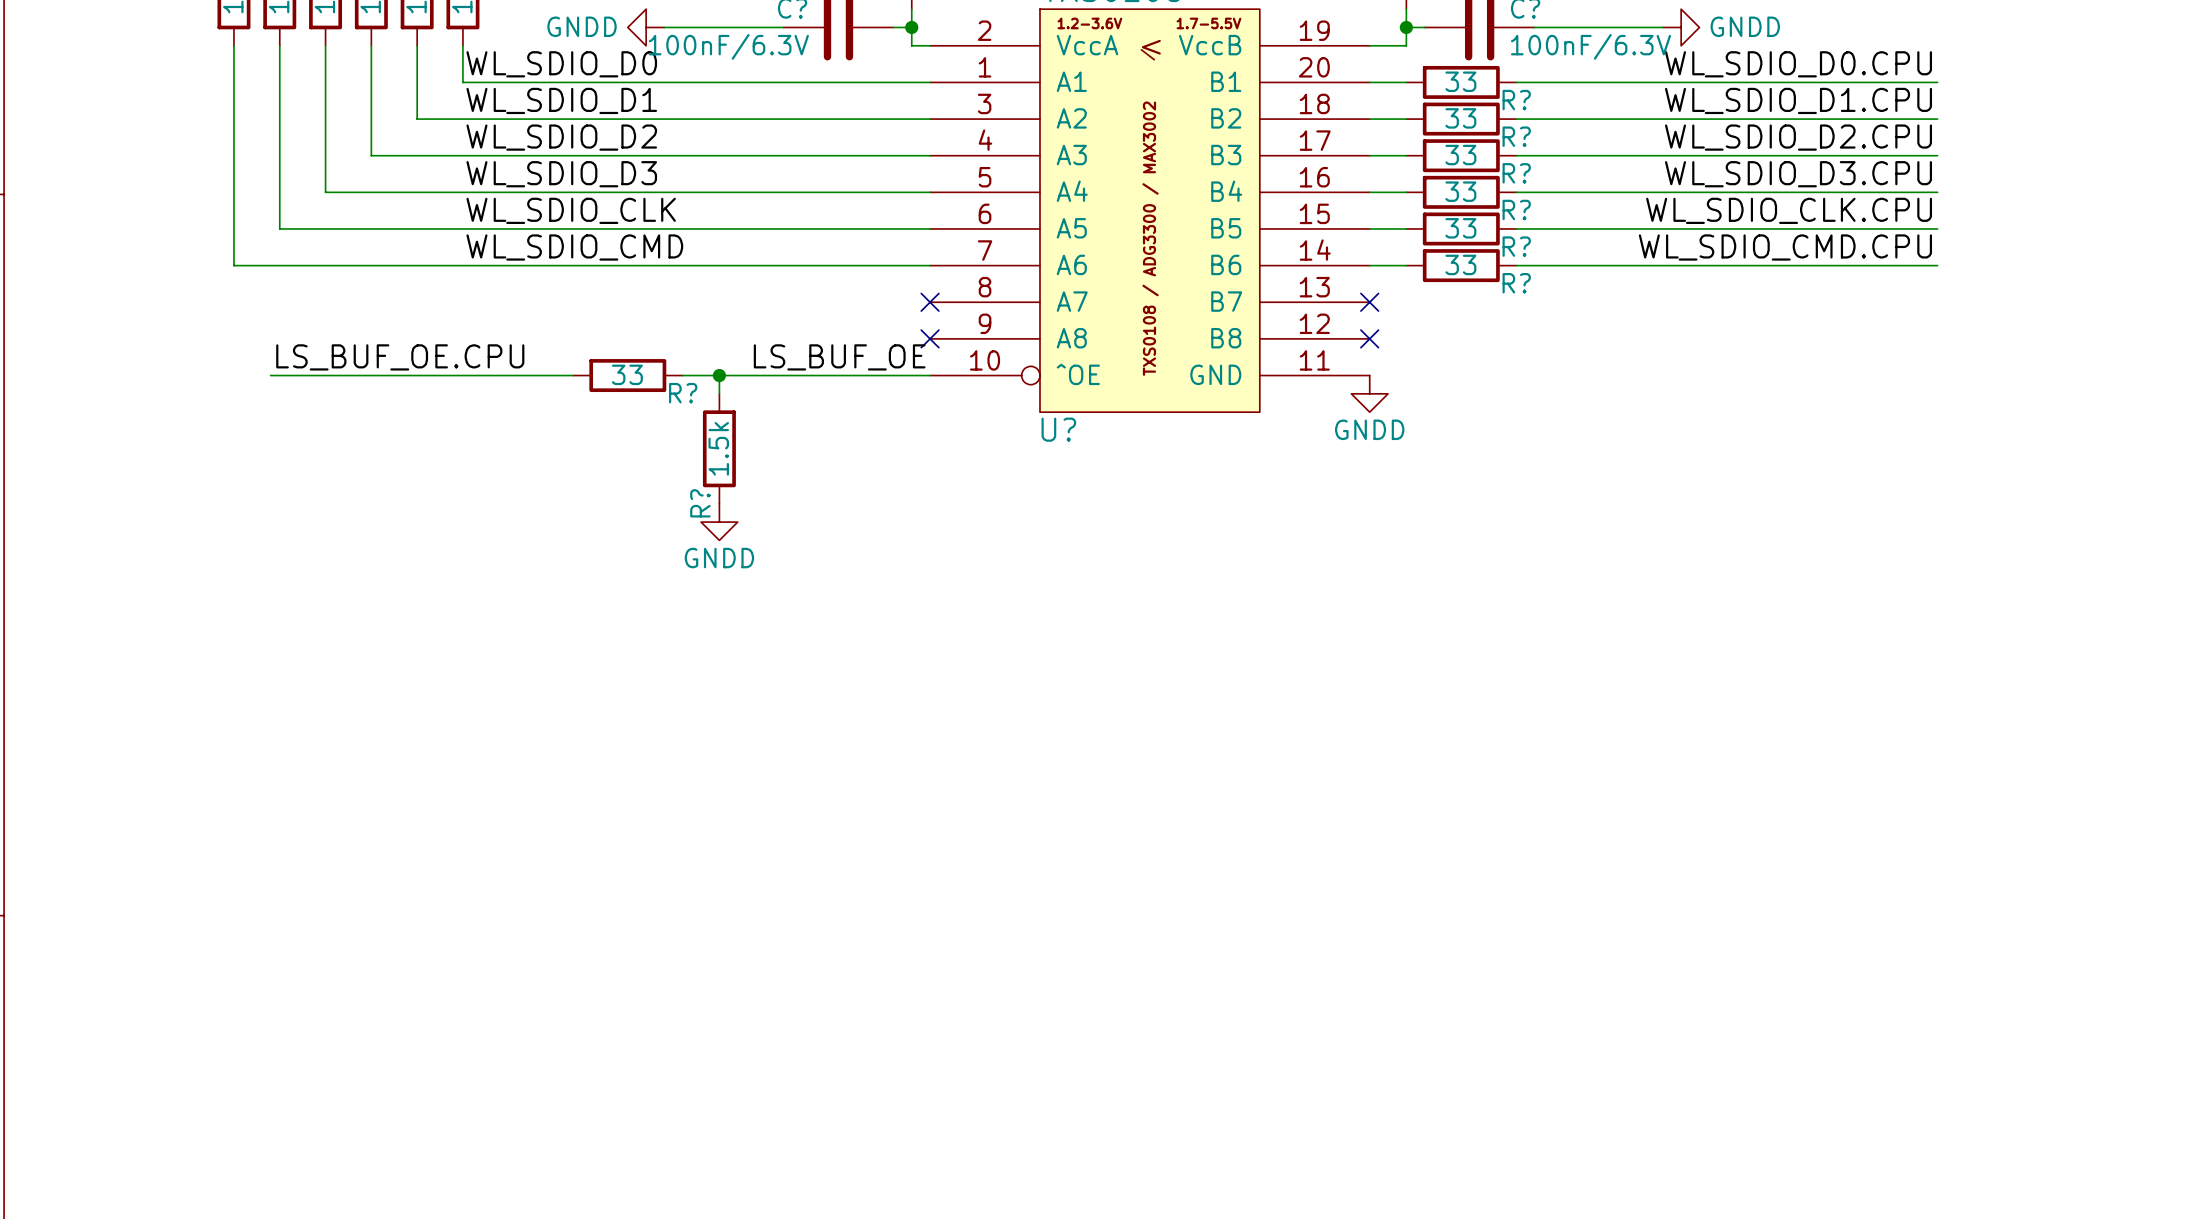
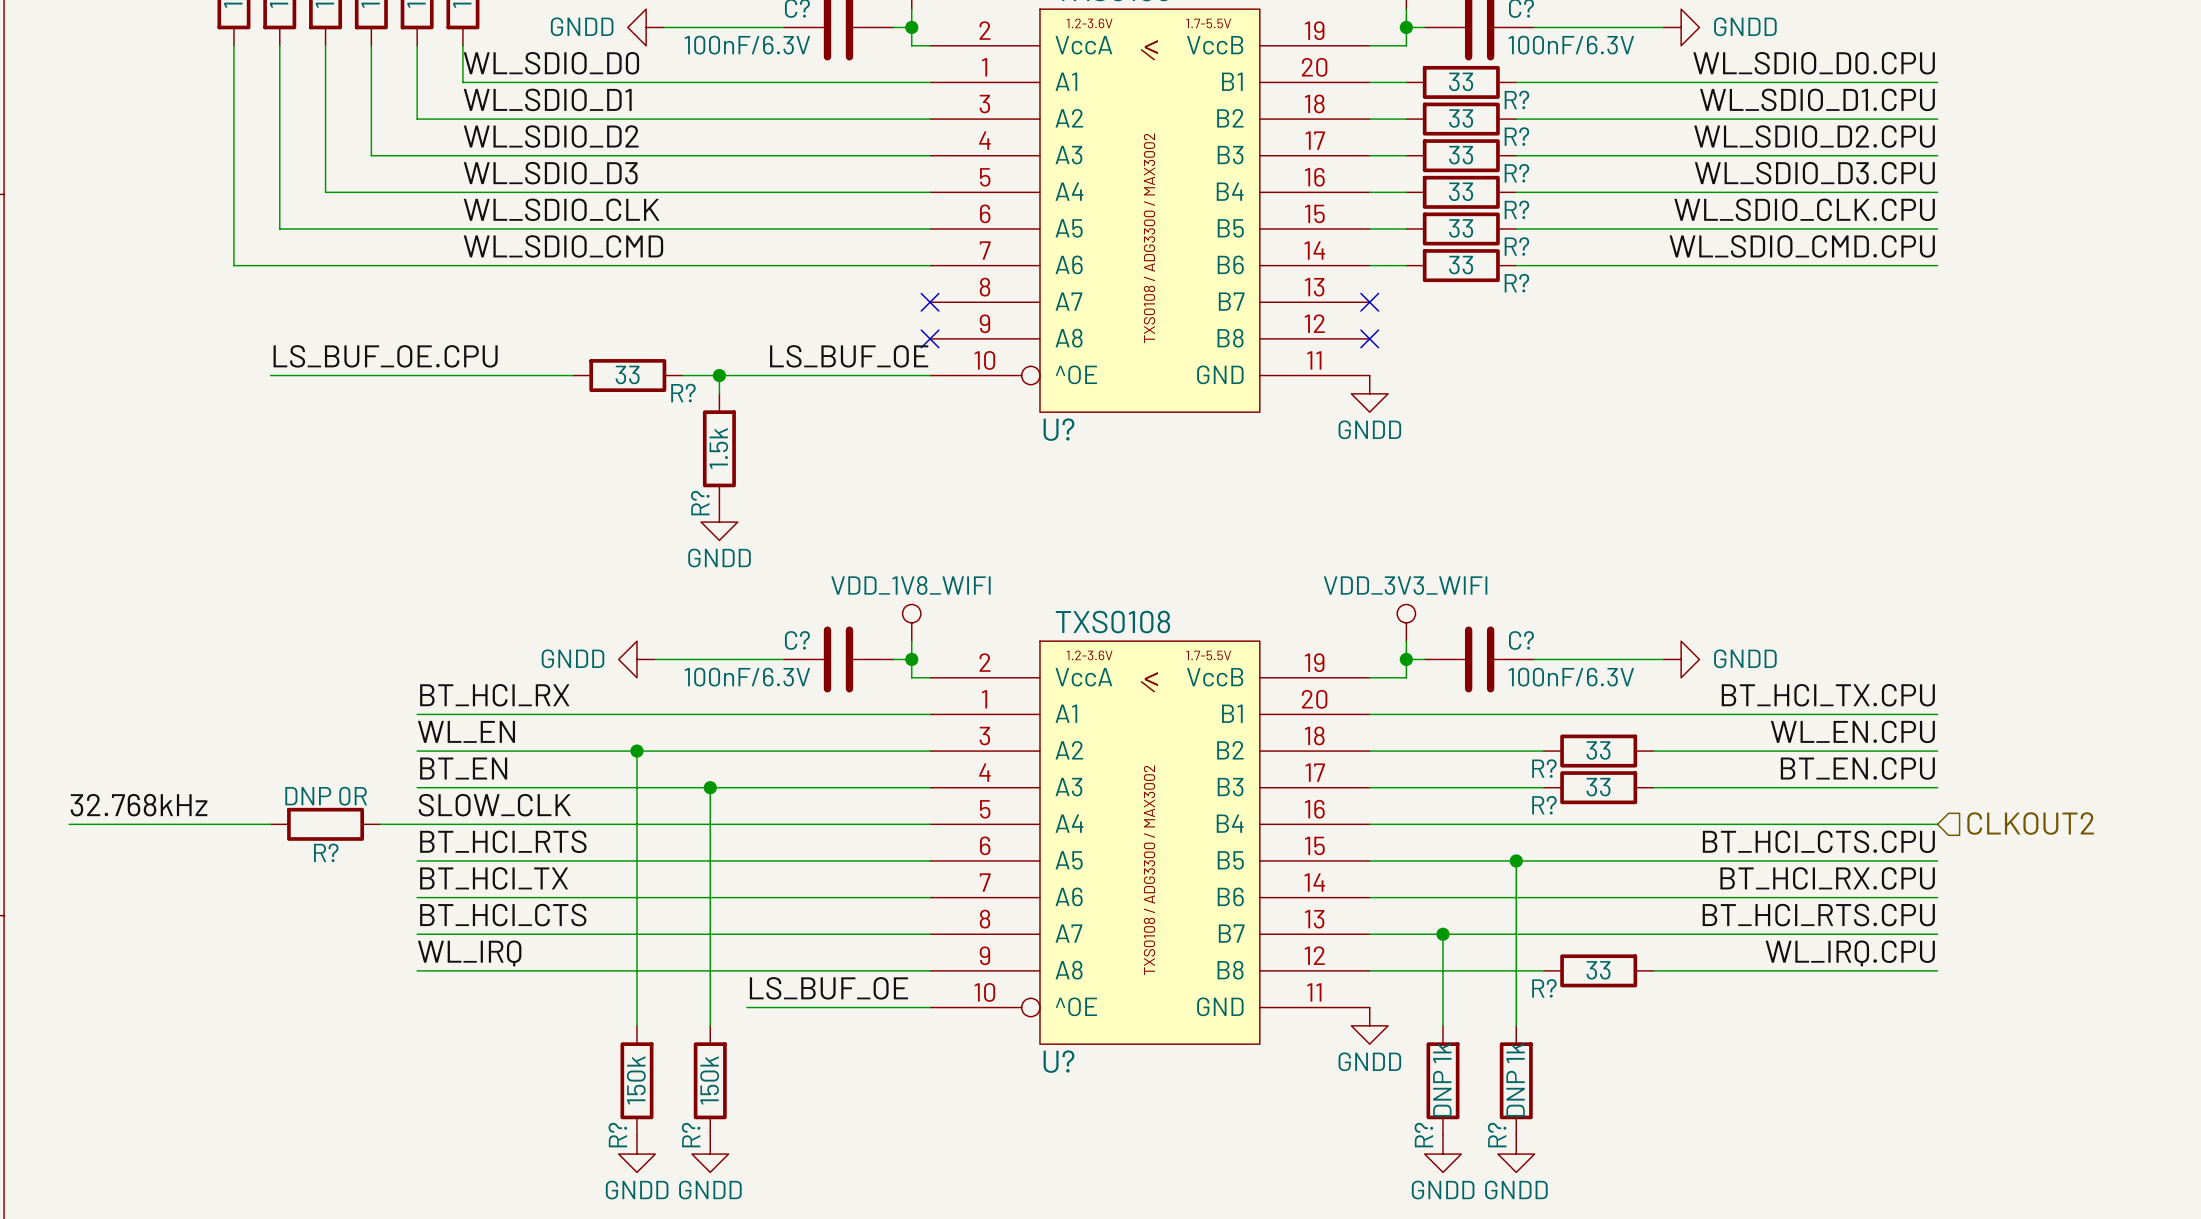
power symbol: none -> VDD_1V8_WIFI (911, 622)
power symbol: none -> VDD_3V3_WIFI (1406, 622)
wire: none -> (911, 641) (911, 677) (930, 677)
wire: none -> (1406, 641) (1406, 677) (1369, 677)
power symbol: none -> GNDD (636, 659)
wire: none -> (655, 659) (783, 659)
C?: none -> 100nF/6.3V (838, 659)
wire: none -> (893, 659) (911, 659)
junction: none -> (911, 659)
wire: none -> (1406, 659) (1424, 659)
junction: none -> (1406, 659)
C?: none -> 100nF/6.3V (1479, 659)
wire: none -> (1534, 659) (1662, 659)
power symbol: none -> GNDD (1681, 659)
label: none -> BT_HCI_RX (494, 695)
label: none -> BT_HCI_TX.CPU (1828, 695)
wire: none -> (417, 714) (930, 714)
wire: none -> (1369, 714) (1937, 714)
label: none -> WL_EN (466, 731)
label: none -> WL_EN.CPU (1852, 731)
wire: none -> (417, 751) (930, 751)
wire: none -> (636, 751) (636, 1025)
junction: none -> (636, 751)
wire: none -> (1369, 751) (1543, 751)
R?: none -> 33 (1598, 751)
wire: none -> (1653, 751) (1937, 751)
label: none -> BT_EN (463, 768)
label: none -> BT_EN.CPU (1857, 768)
wire: none -> (417, 787) (930, 787)
wire: none -> (710, 787) (710, 1025)
junction: none -> (710, 787)
wire: none -> (1369, 787) (1543, 787)
R?: none -> 33 (1598, 787)
wire: none -> (1653, 787) (1937, 787)
label: none -> 32.768kHz (139, 805)
label: none -> SLOW_CLK (494, 805)
hierarchical label: none -> CLKOUT2 (2030, 823)
wire: none -> (69, 824) (270, 824)
R?: none -> DNP 0R (325, 824)
wire: none -> (380, 824) (930, 824)
wire: none -> (1369, 824) (1937, 824)
label: none -> BT_HCI_RTS (503, 841)
U?: none -> TXS0108 (1149, 842)
label: none -> BT_HCI_CTS.CPU (1818, 841)
wire: none -> (417, 860) (930, 860)
wire: none -> (1369, 860) (1937, 860)
wire: none -> (1516, 860) (1516, 1025)
junction: none -> (1516, 860)
label: none -> BT_HCI_TX (494, 878)
label: none -> BT_HCI_RX.CPU (1827, 878)
wire: none -> (417, 897) (930, 897)
wire: none -> (1369, 897) (1937, 897)
label: none -> BT_HCI_CTS (503, 915)
label: none -> BT_HCI_RTS.CPU (1818, 915)
wire: none -> (417, 934) (930, 934)
wire: none -> (1369, 934) (1937, 934)
wire: none -> (1442, 934) (1442, 1025)
junction: none -> (1442, 934)
label: none -> WL_IRQ (469, 953)
label: none -> WL_IRQ.CPU (1850, 953)
wire: none -> (417, 970) (930, 970)
wire: none -> (1369, 970) (1543, 970)
R?: none -> 33 (1598, 970)
wire: none -> (1653, 970) (1937, 970)
label: none -> LS_BUF_OE (828, 988)
wire: none -> (746, 1007) (930, 1007)
power symbol: none -> GNDD (1369, 1025)
R?: none -> 150k (636, 1080)
R?: none -> 150k (710, 1080)
R?: none -> DNP 1k (1442, 1080)
R?: none -> DNP 1k (1516, 1080)
power symbol: none -> GNDD (636, 1154)
power symbol: none -> GNDD (710, 1154)
power symbol: none -> GNDD (1442, 1154)
power symbol: none -> GNDD (1516, 1154)

